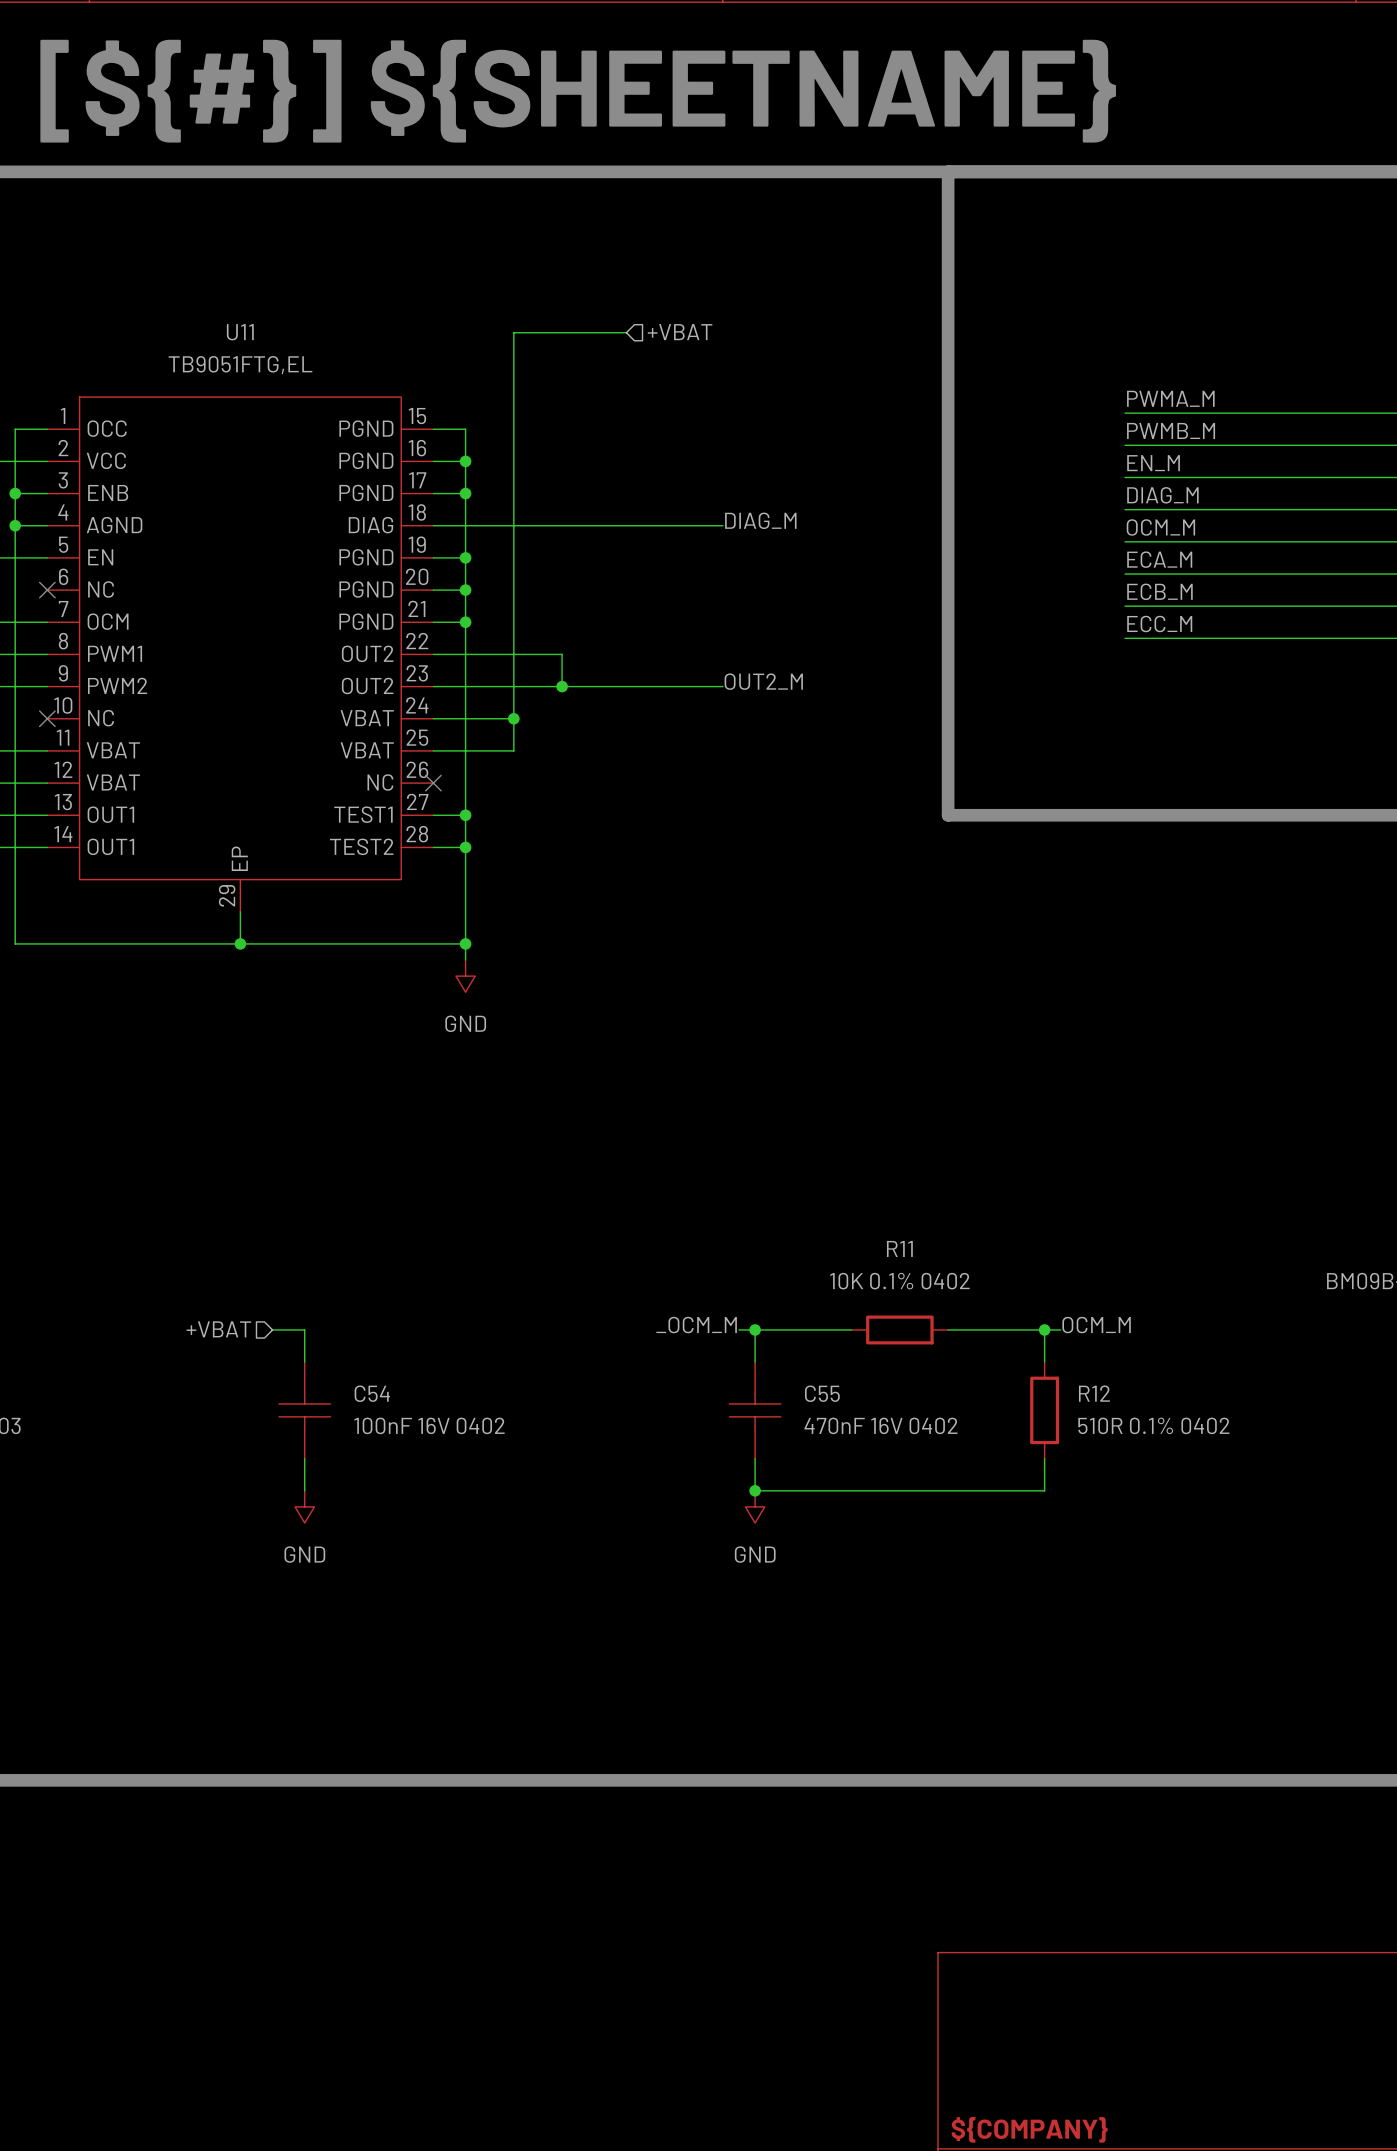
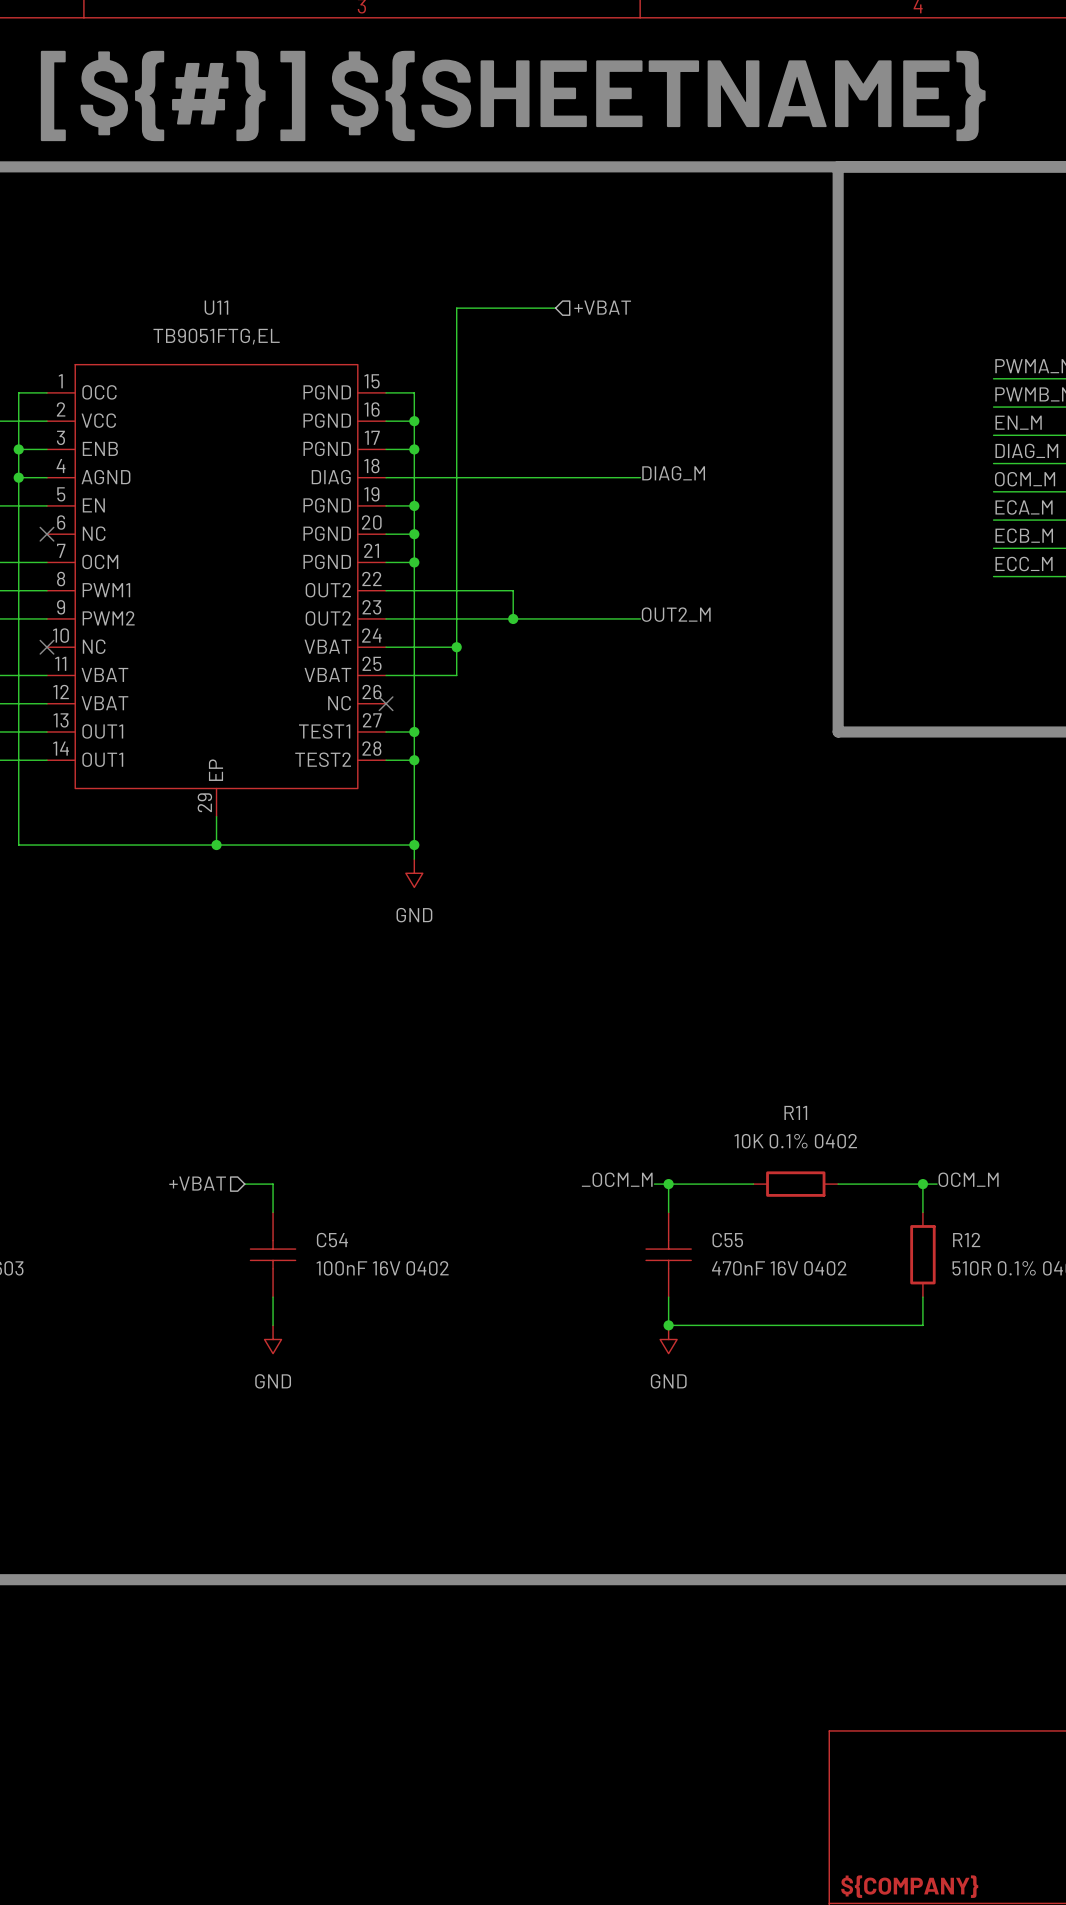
wire: (562, 654) (562, 686) -> (499, 590) (513, 590) (513, 618)
junction position: (562, 686) -> (513, 618)

